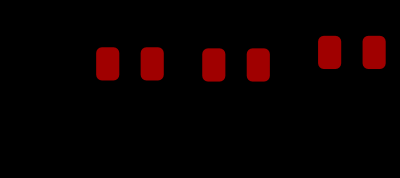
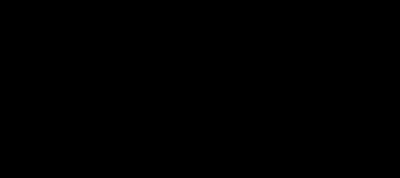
part: (351, 52) -> none
part: (129, 63) -> none
part: (236, 64) -> none

